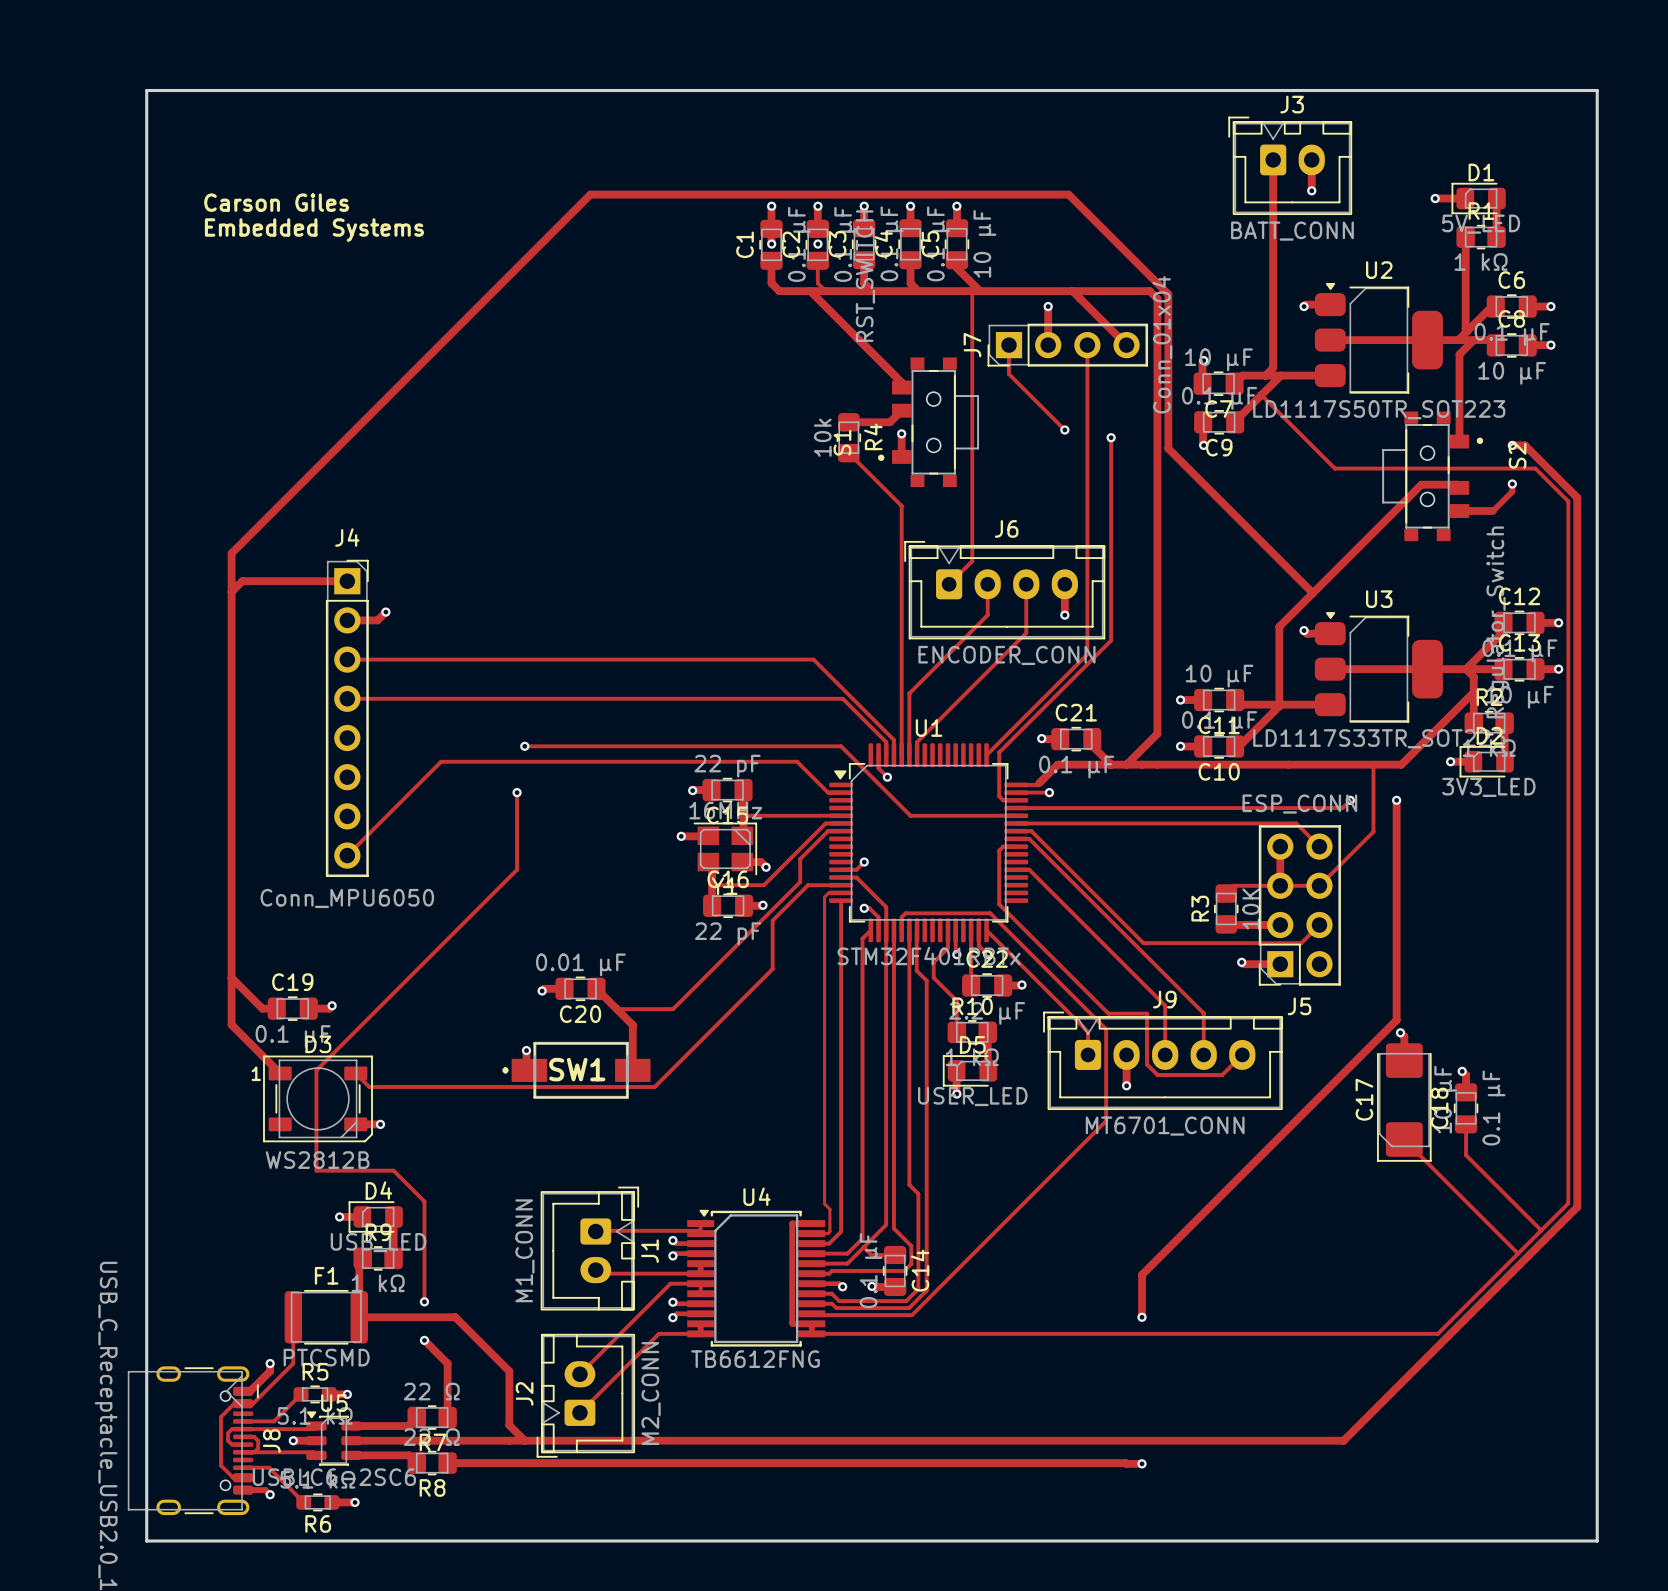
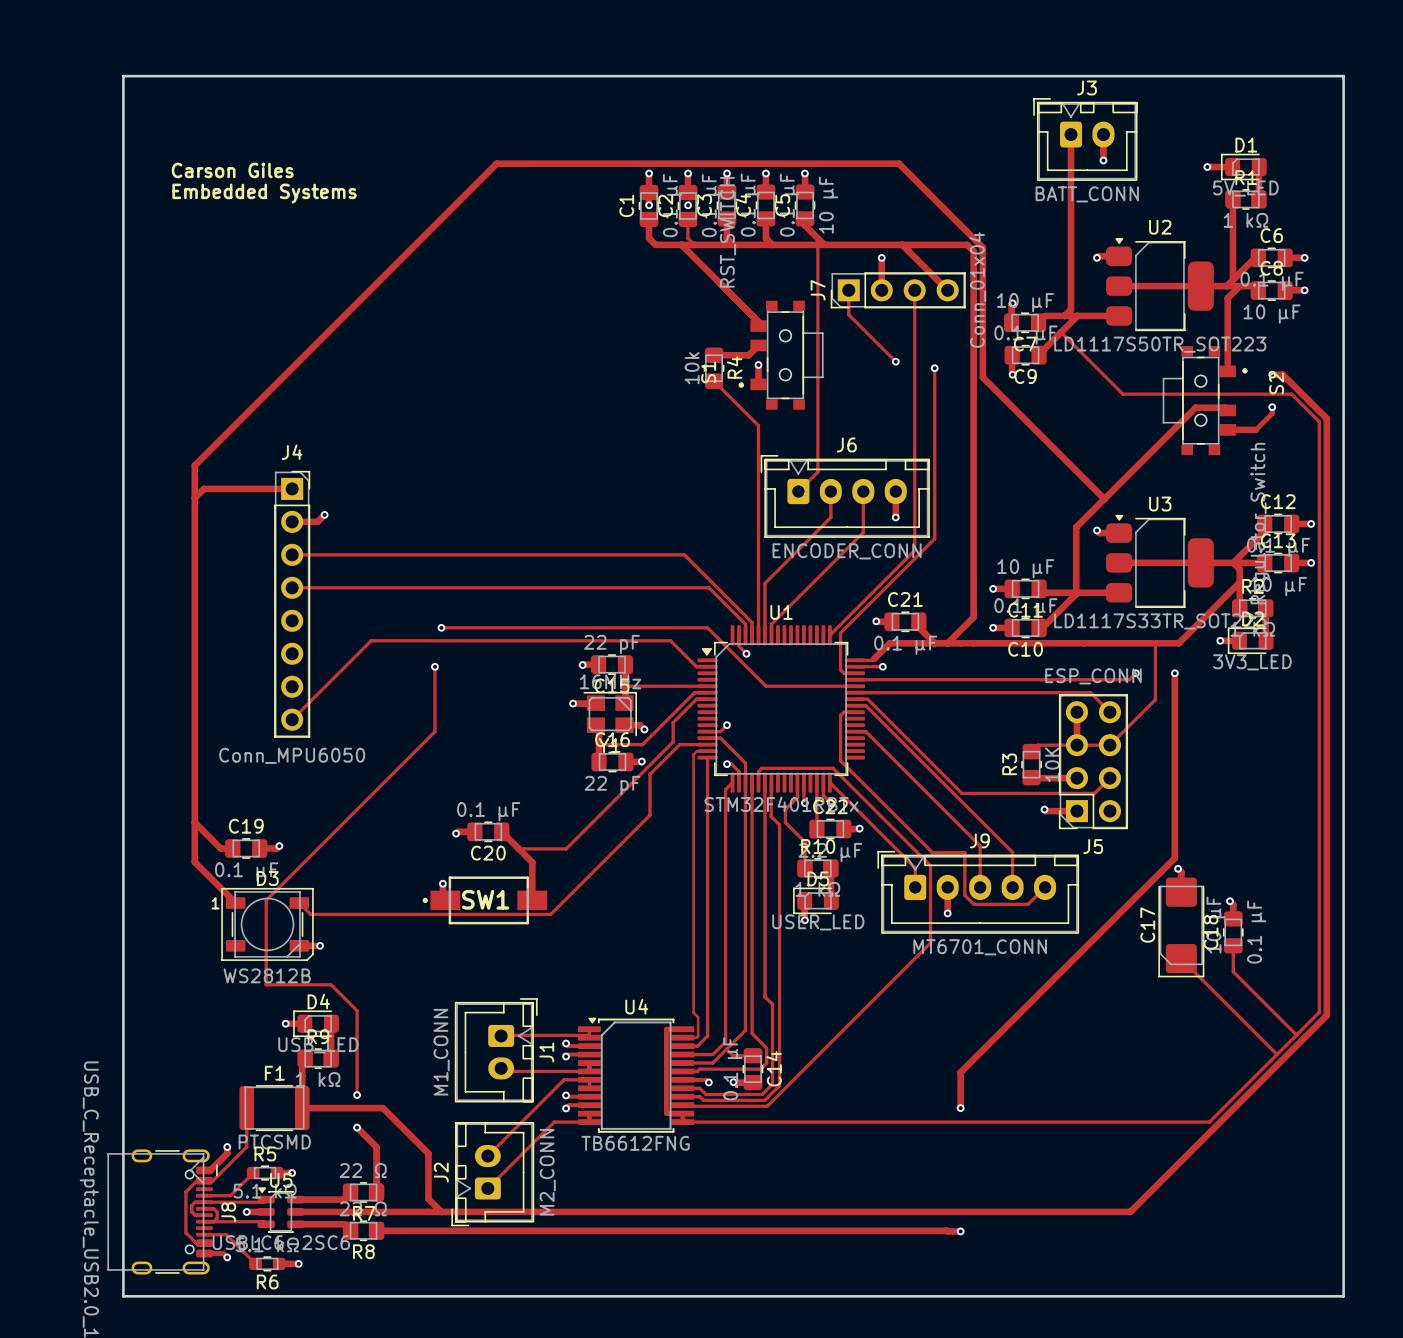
C20 value: 0.01 µF (580, 964) -> 0.1 µF (488, 811)

